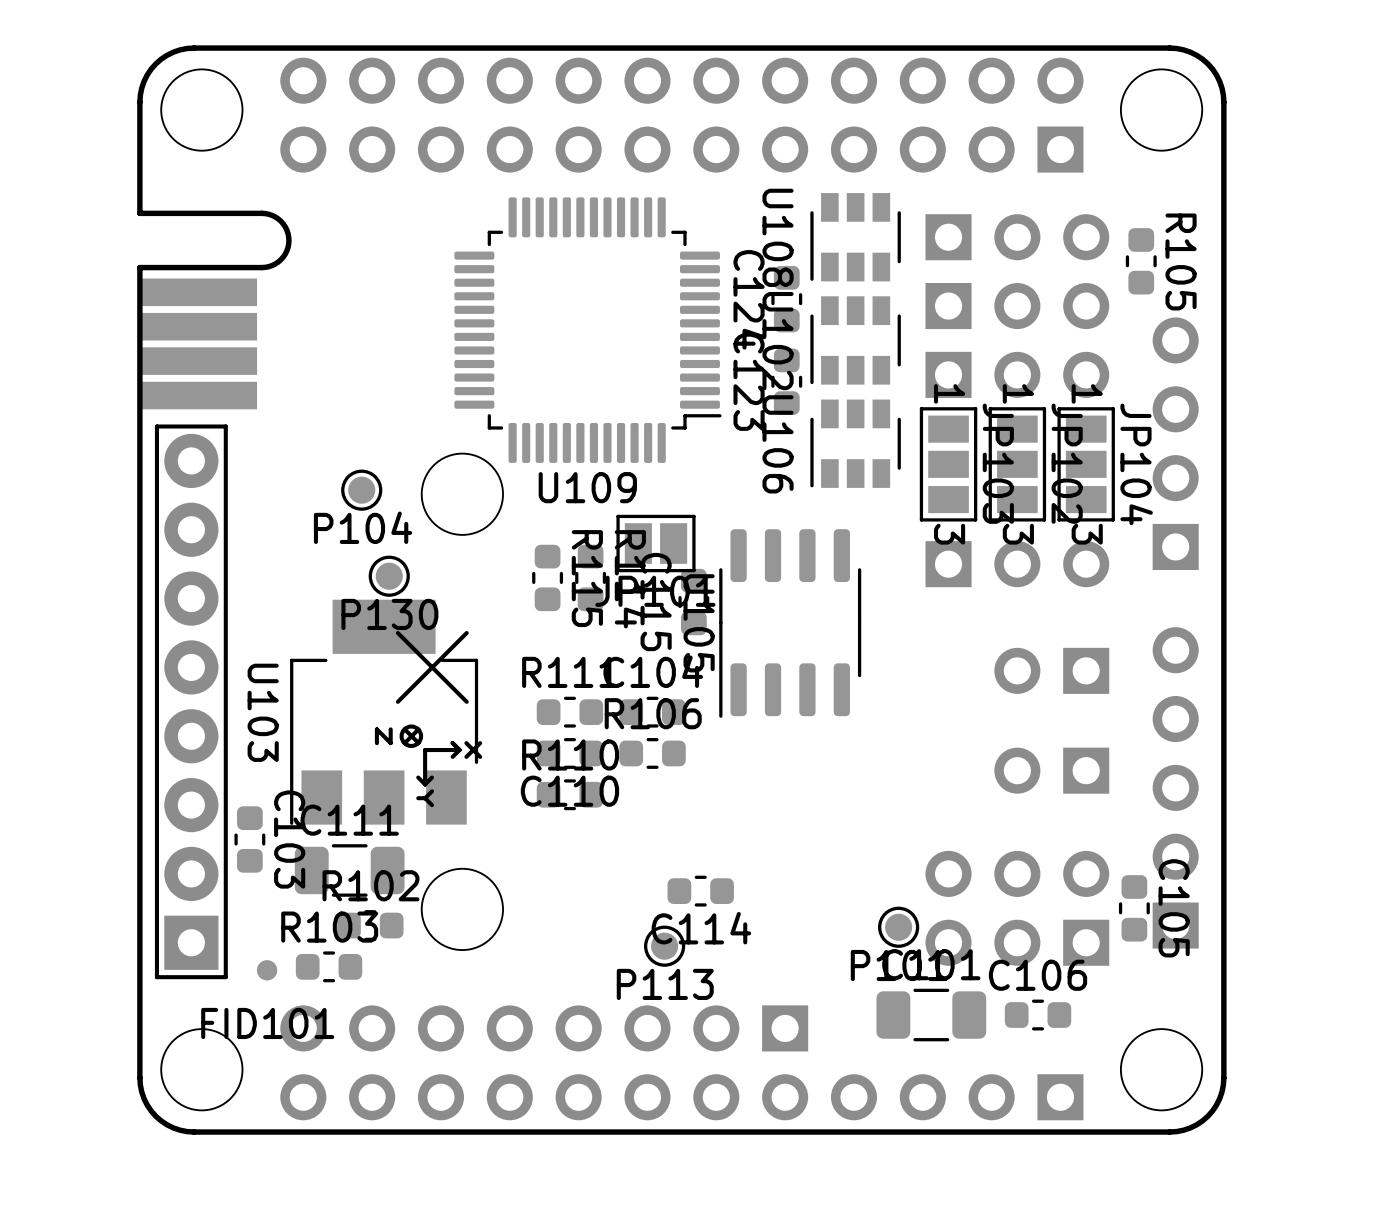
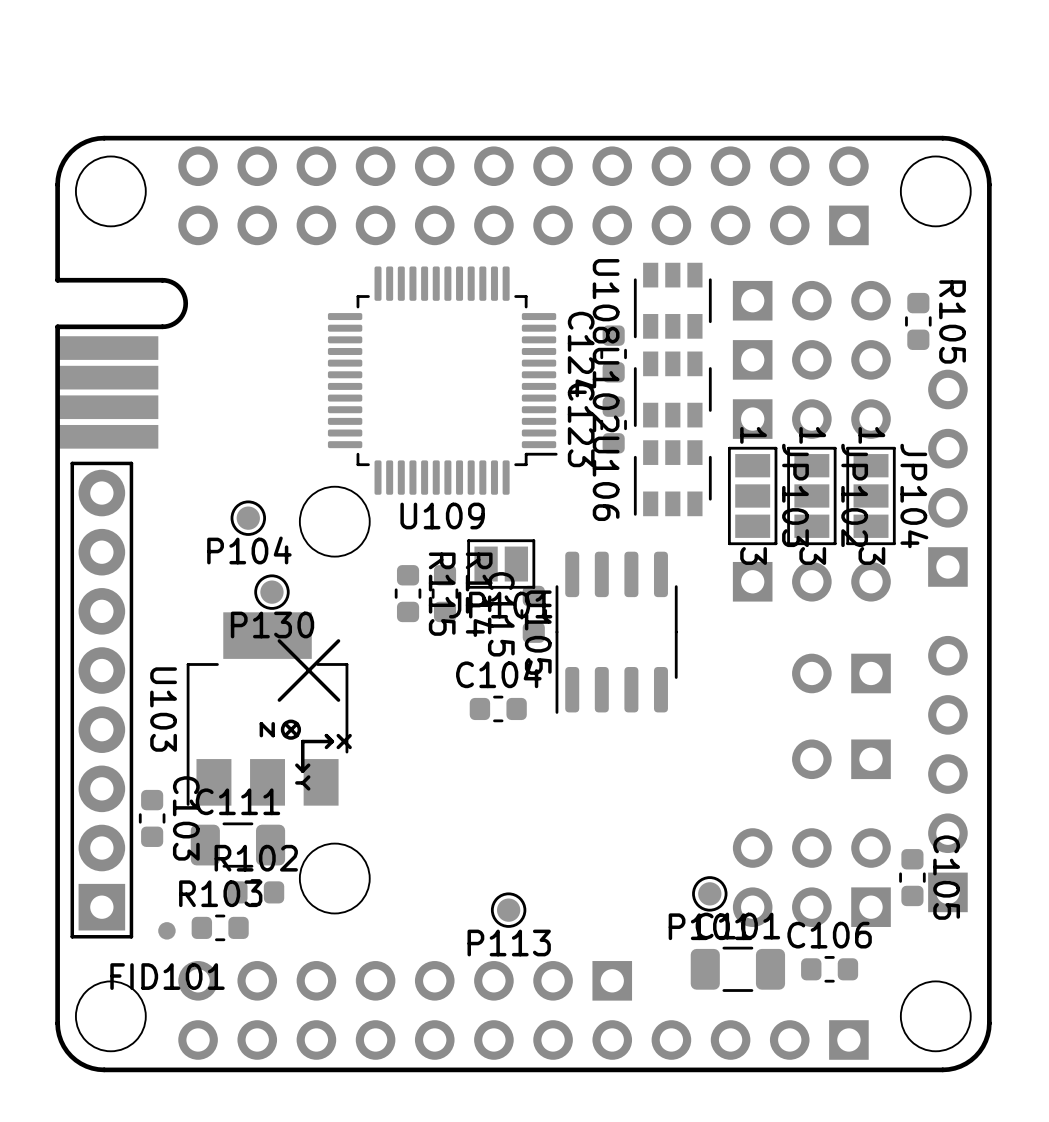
R111: (569, 712) -> none
C110: (569, 753) -> none
R106: (652, 753) -> none
R110: (569, 794) -> none
C114: (700, 891) -> none

